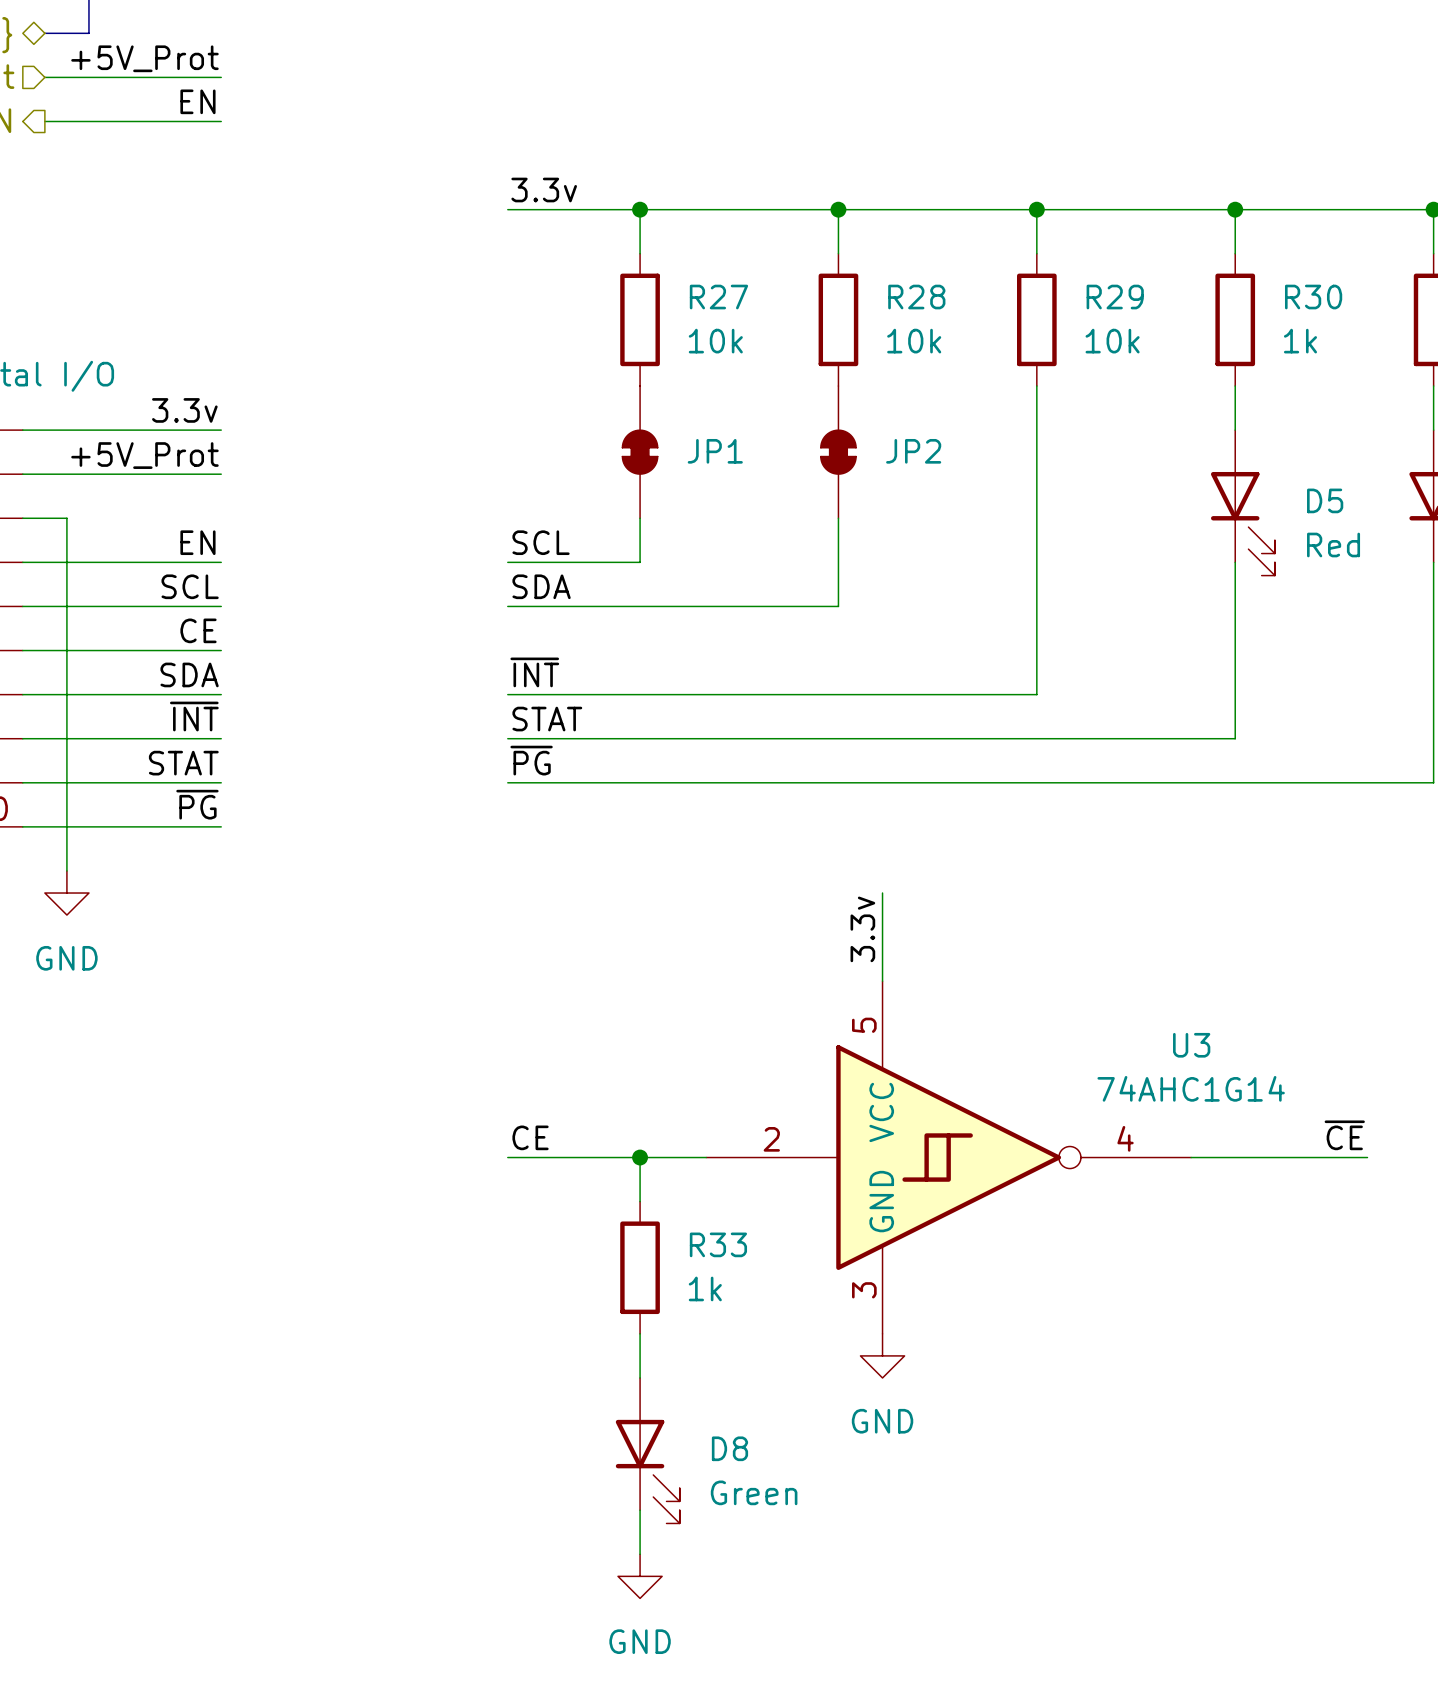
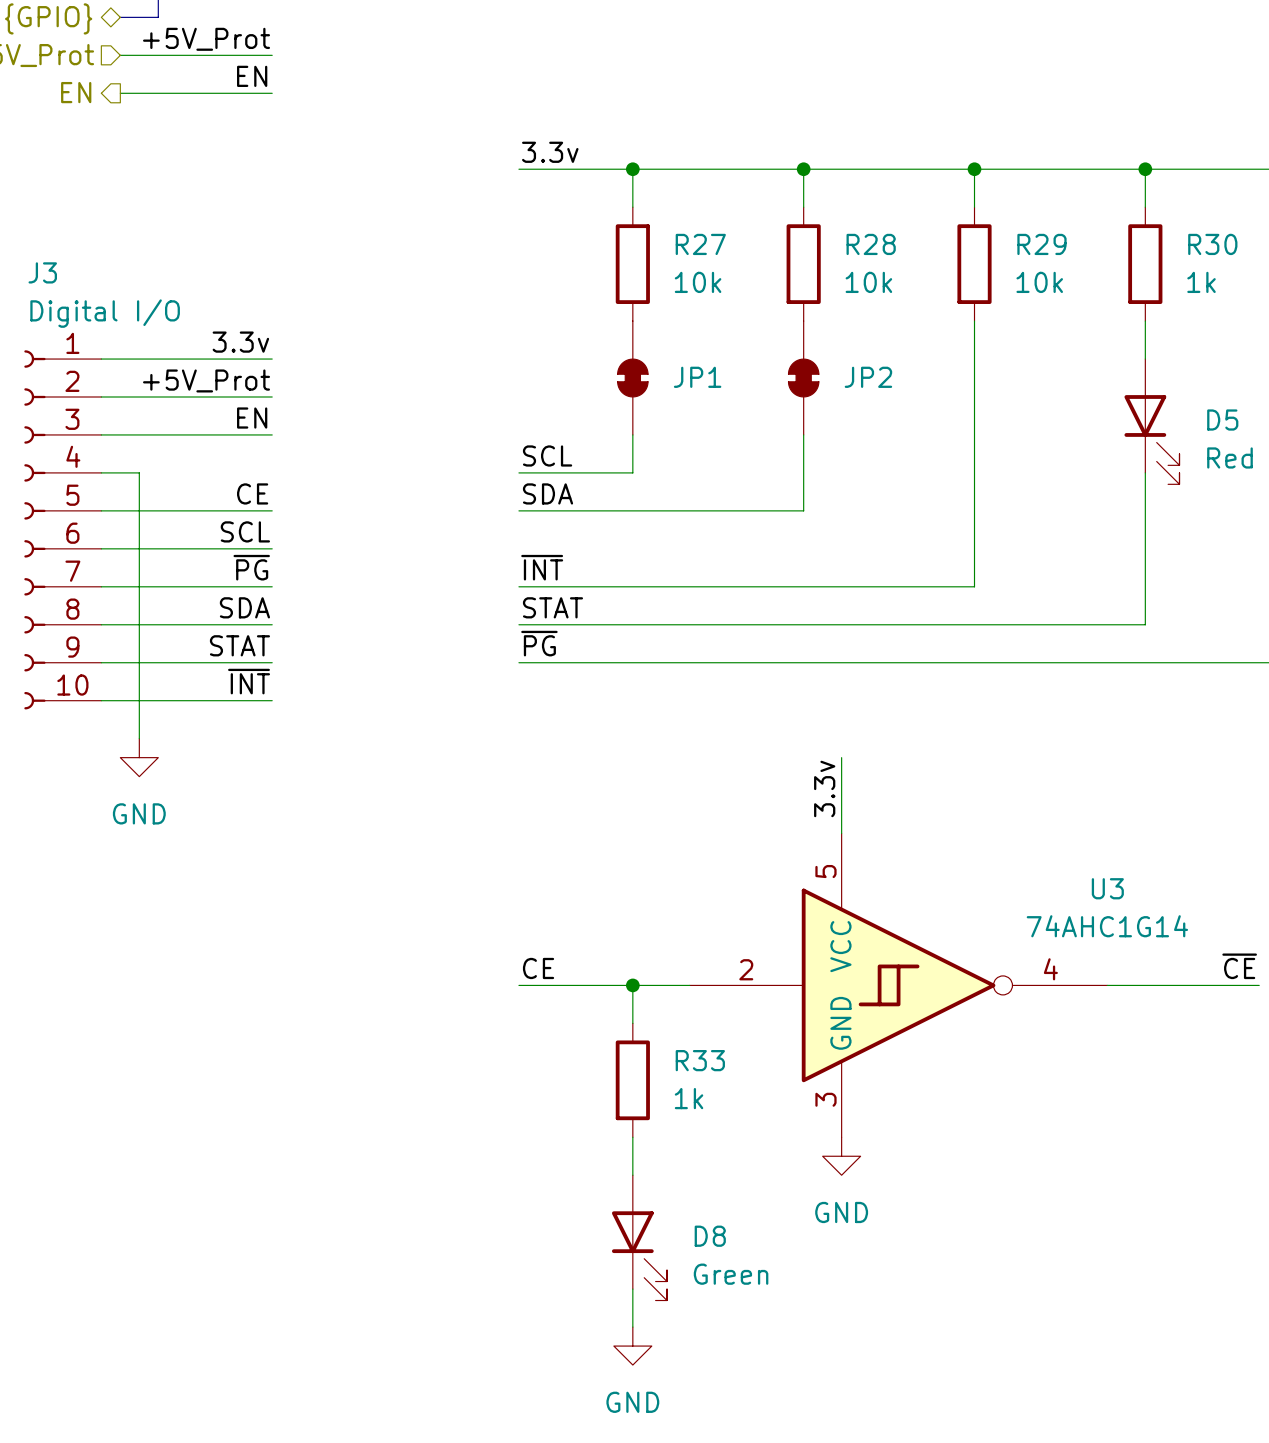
wire: (66, 518) (66, 562) (221, 562) -> (139, 434) (272, 434)
label position: EN (197, 542) -> EN (252, 418)
label: SCL (190, 586) -> CE (252, 493)
label: CE (198, 630) -> SCL (245, 531)
label: SDA (189, 674) -> ~{PG} (251, 567)
label: ~{INT} (194, 716) -> SDA (244, 607)
label: ~{PG} (197, 804) -> ~{INT} (249, 681)

